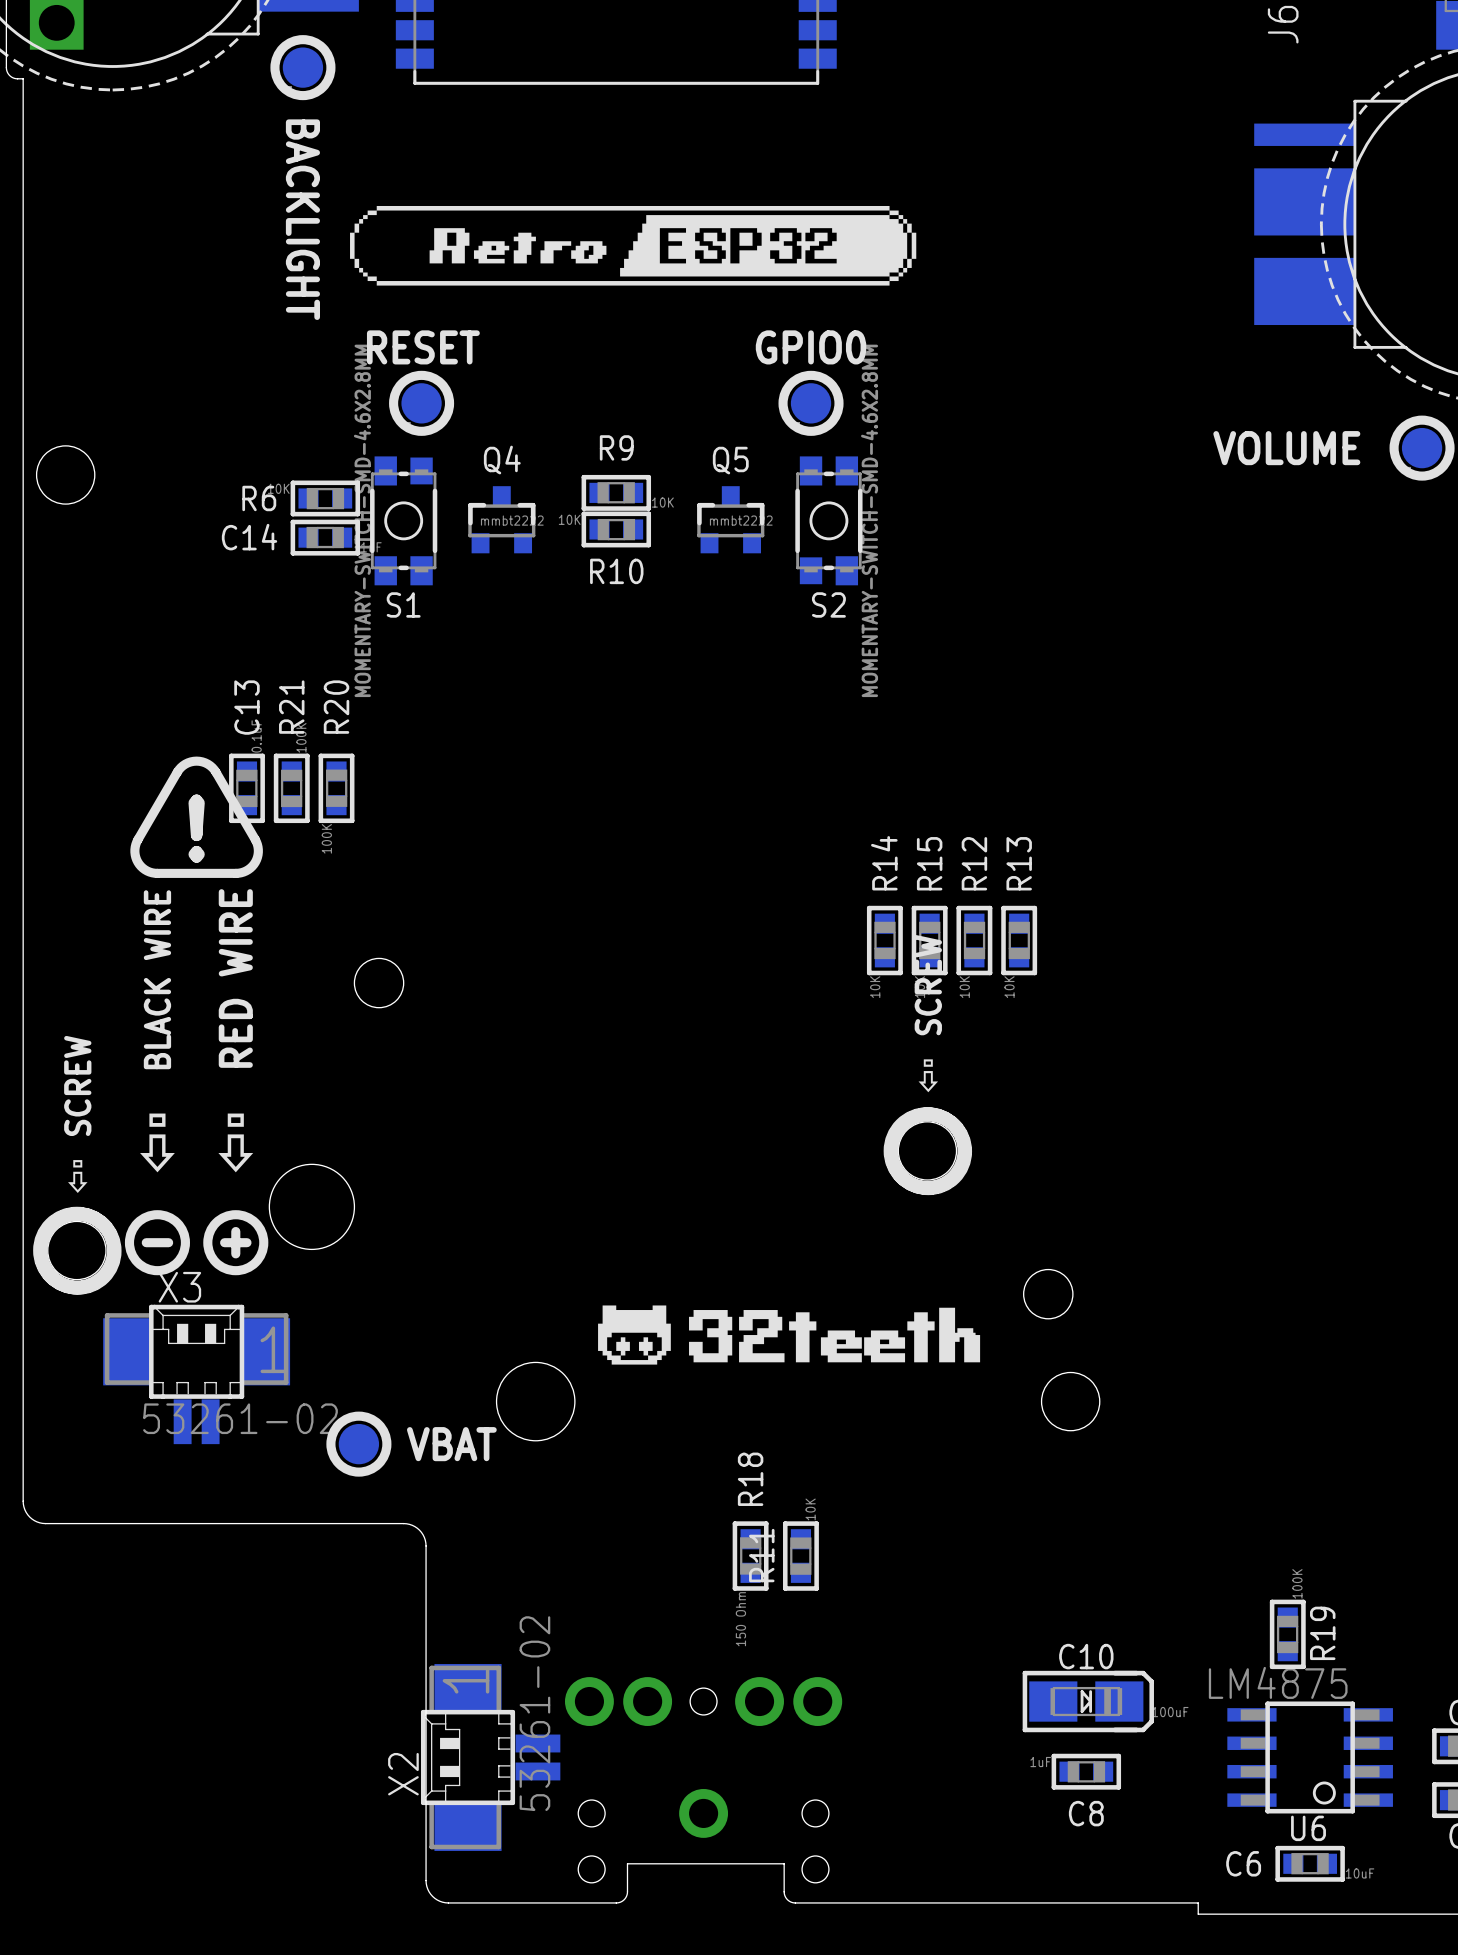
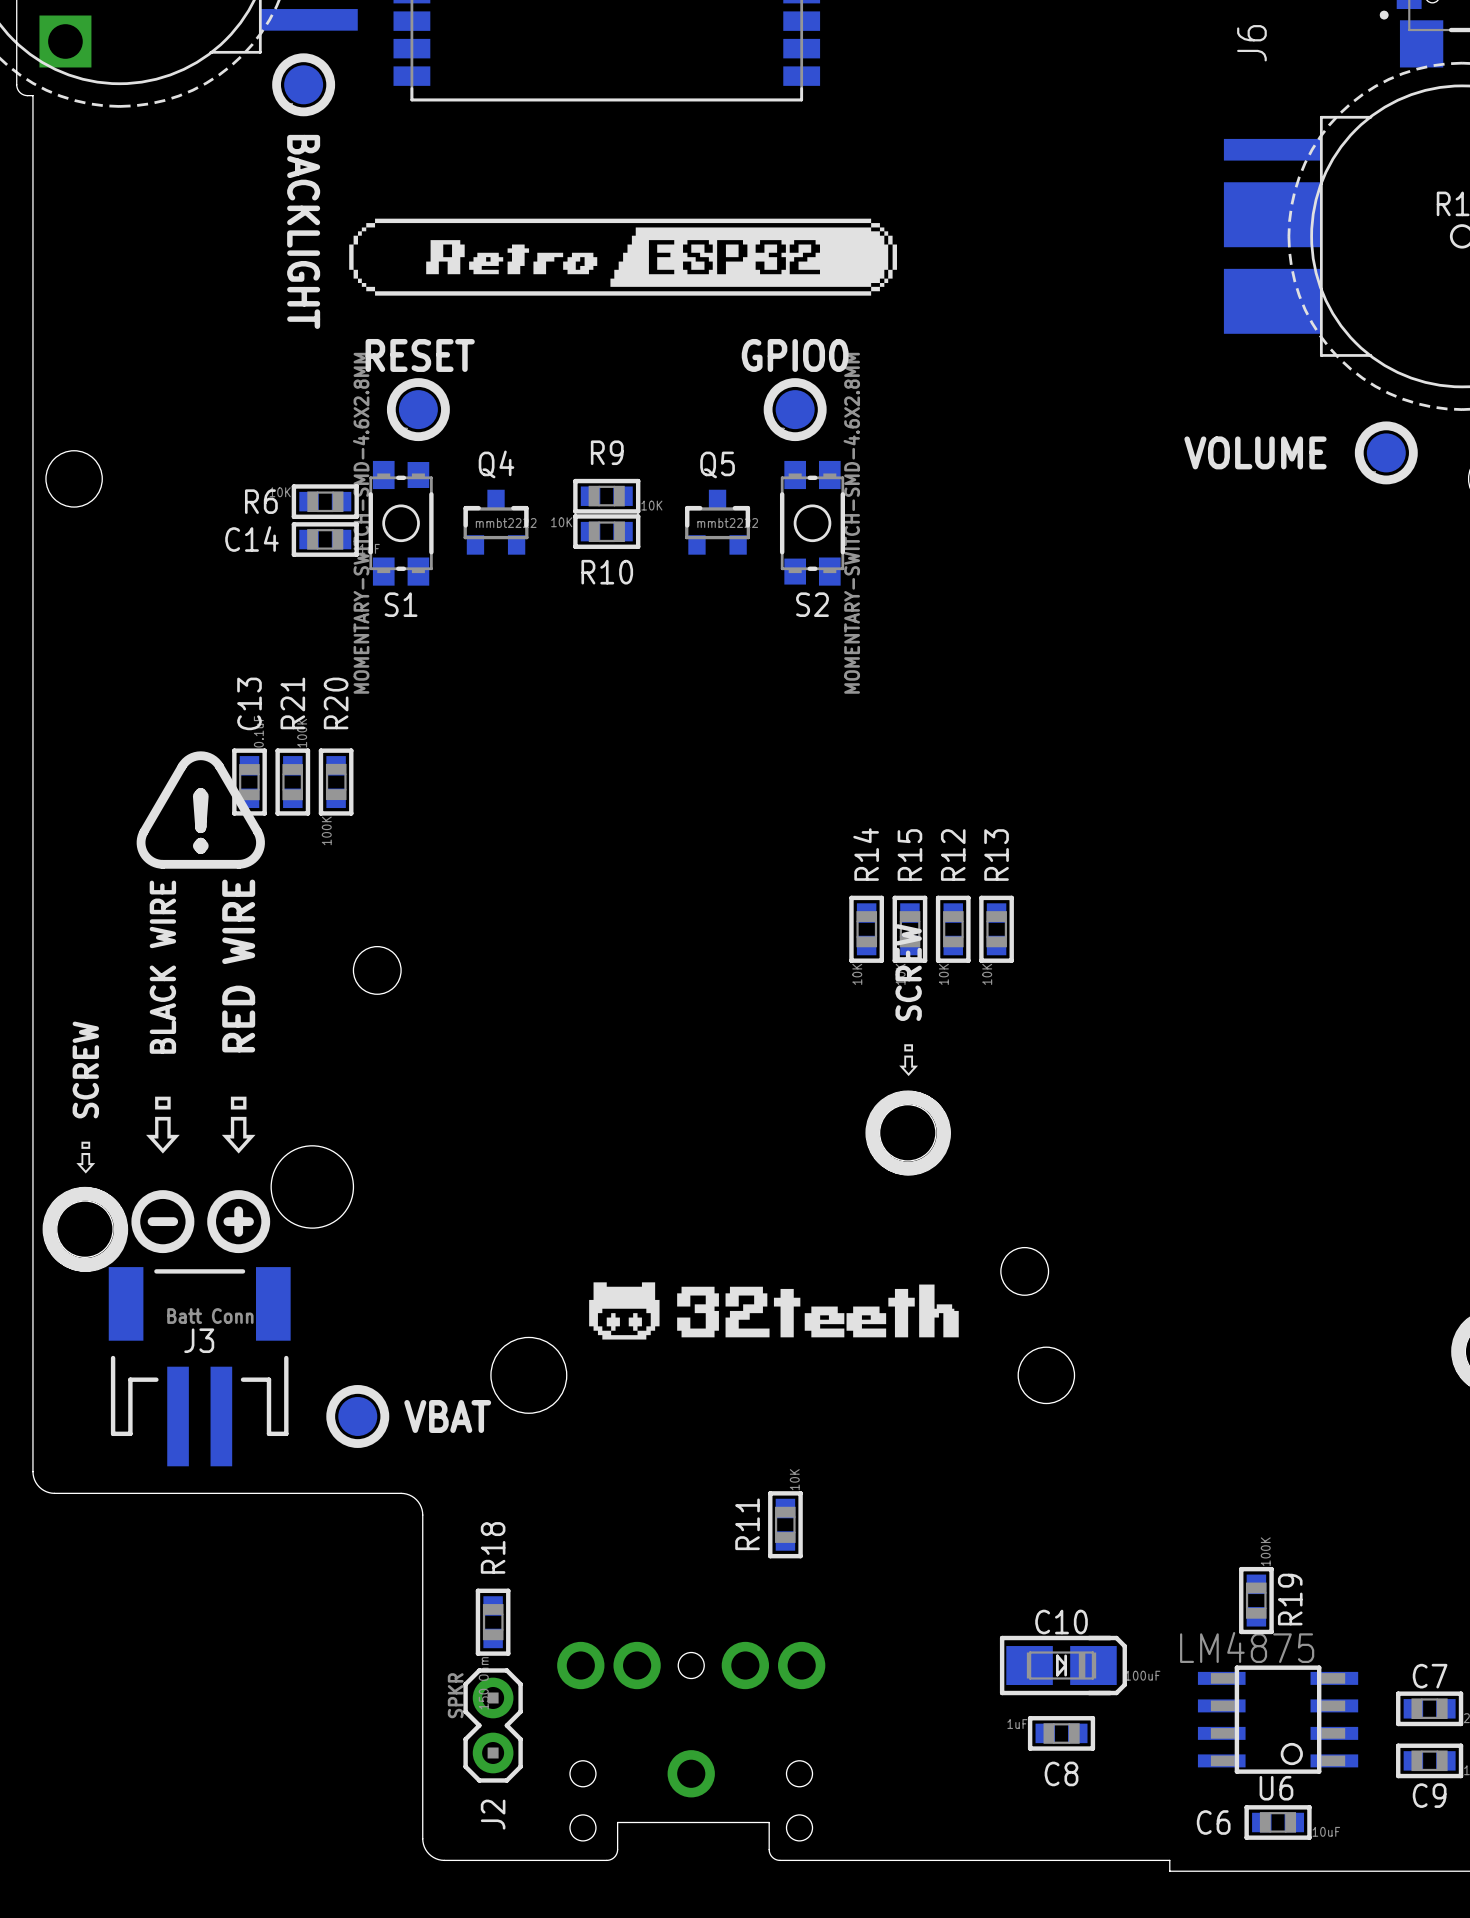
X3: 53261-02 (196, 1374) -> none
J3: none -> Batt Conn (199, 1366)
R18 position: (750, 1556) -> (493, 1622)
X2: 53261-02 (490, 1757) -> none
J2: none -> SPKR (493, 1725)

